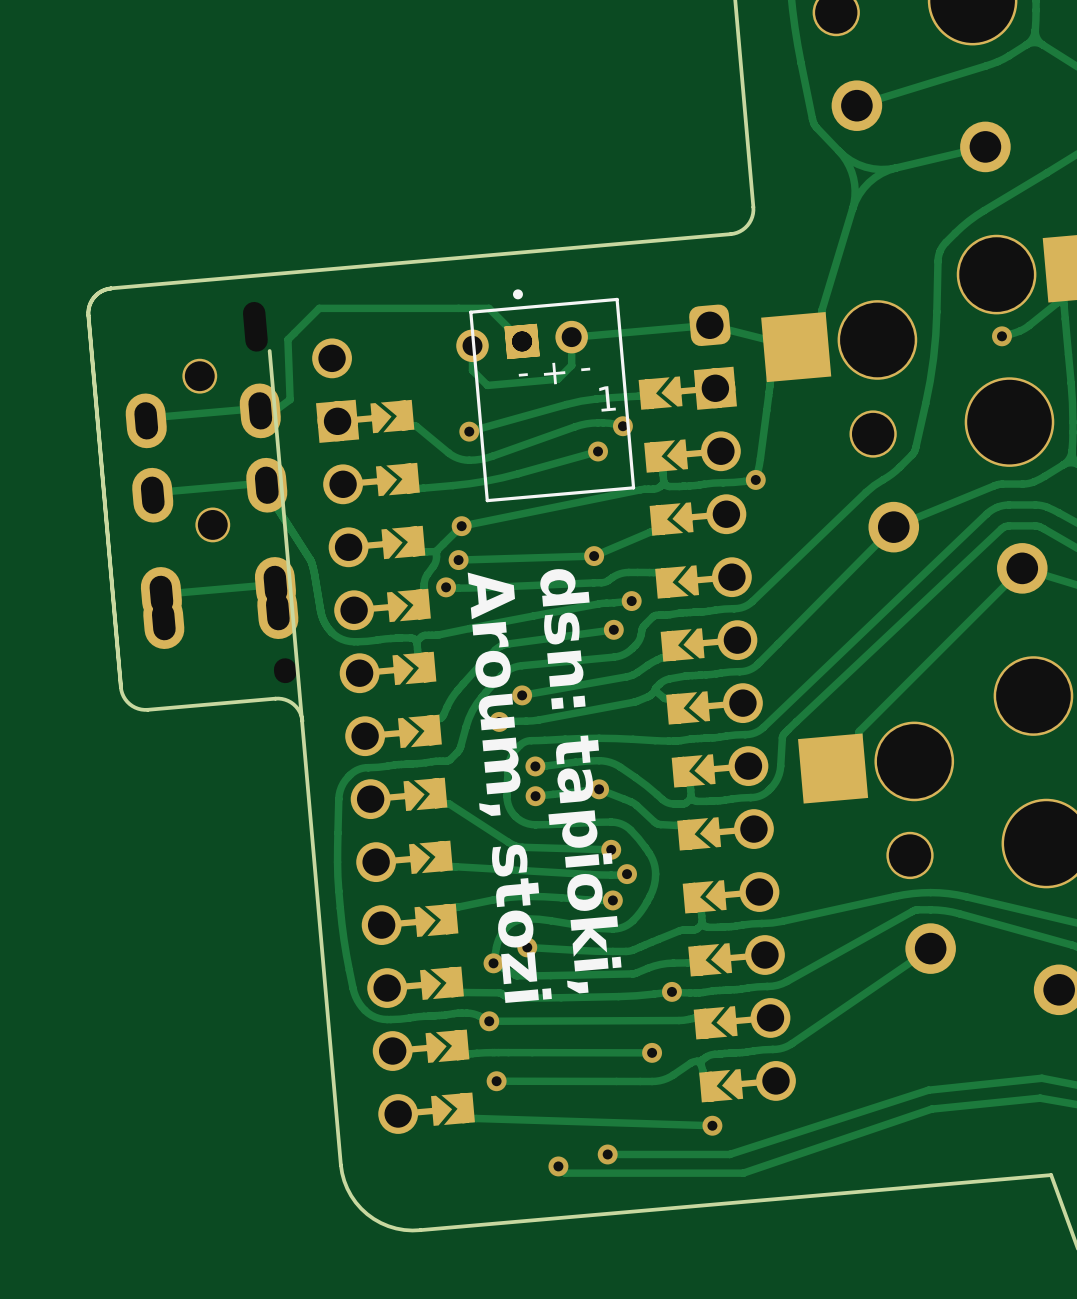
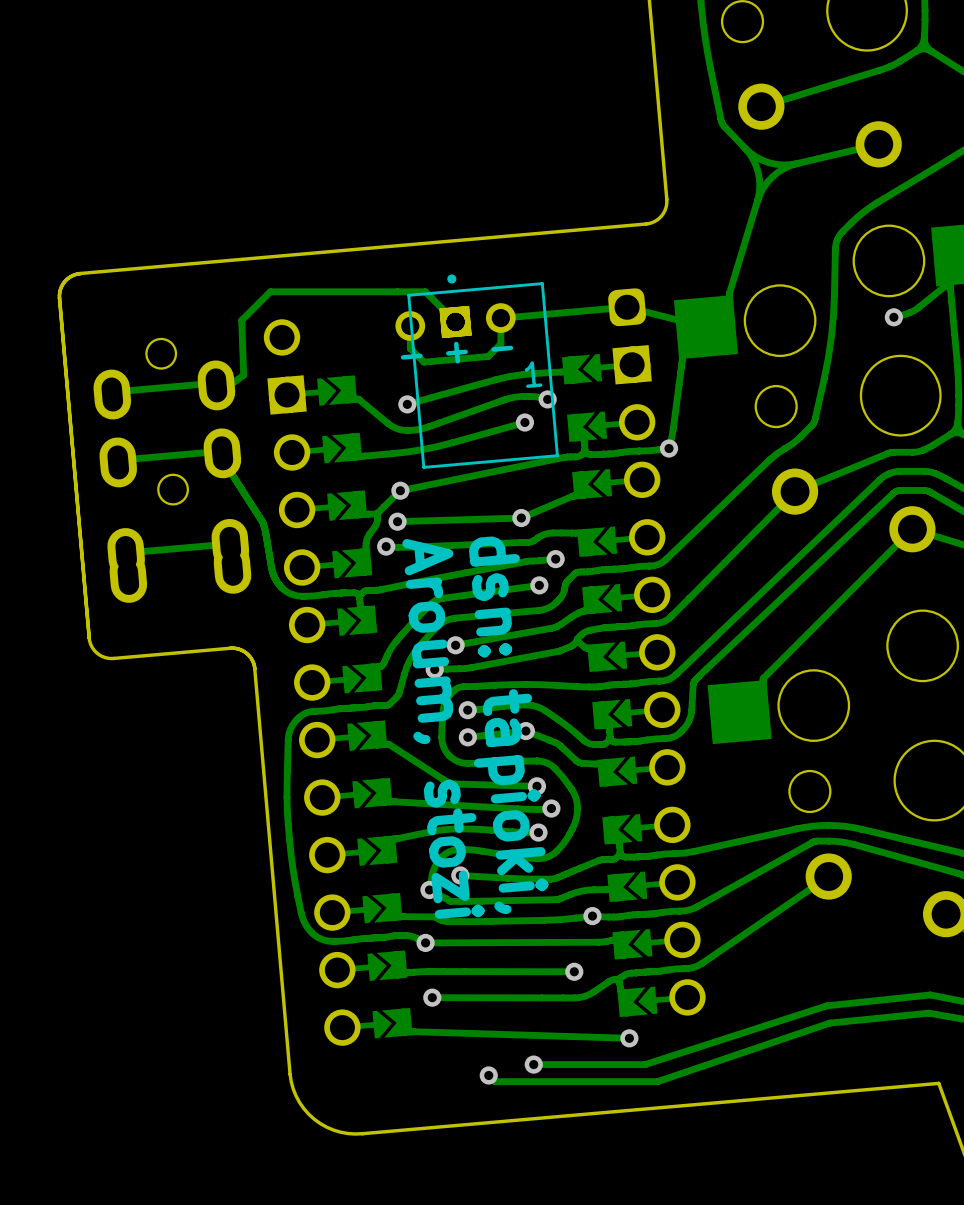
board edge: (269, 350) (340, 1165) -> (230, 648) (238, 649) (246, 653) (252, 660) (254, 668) (290, 1074)

